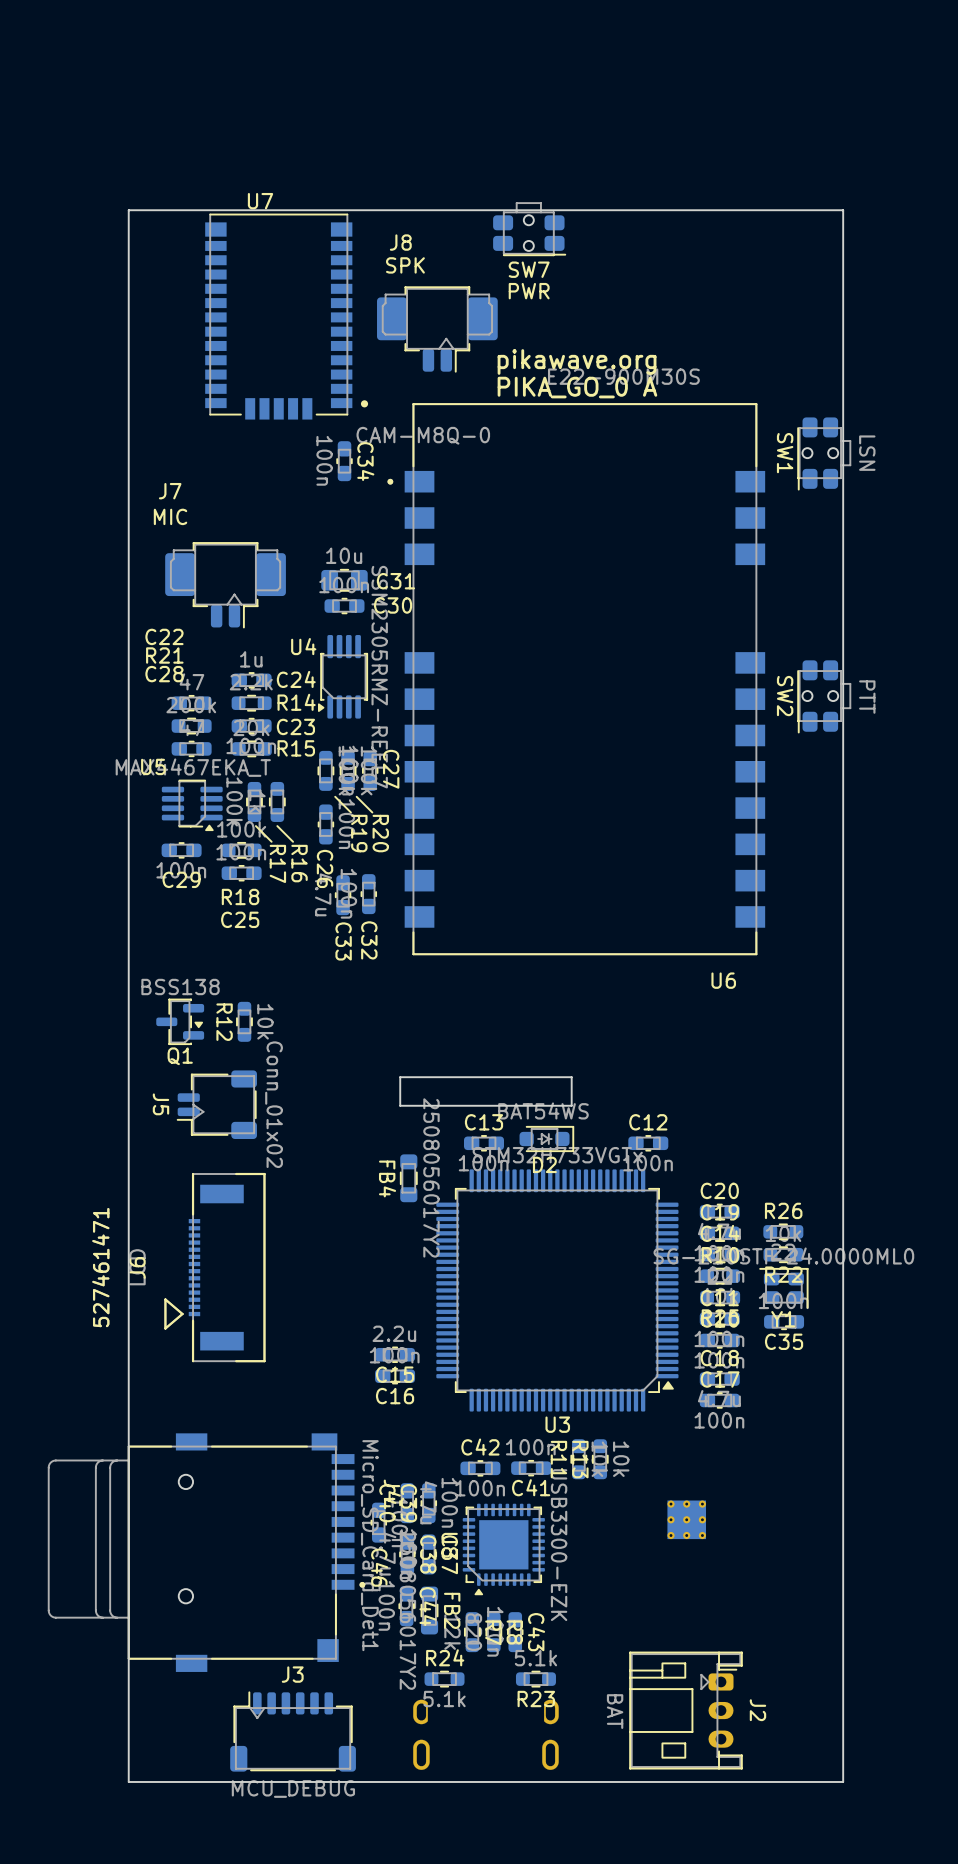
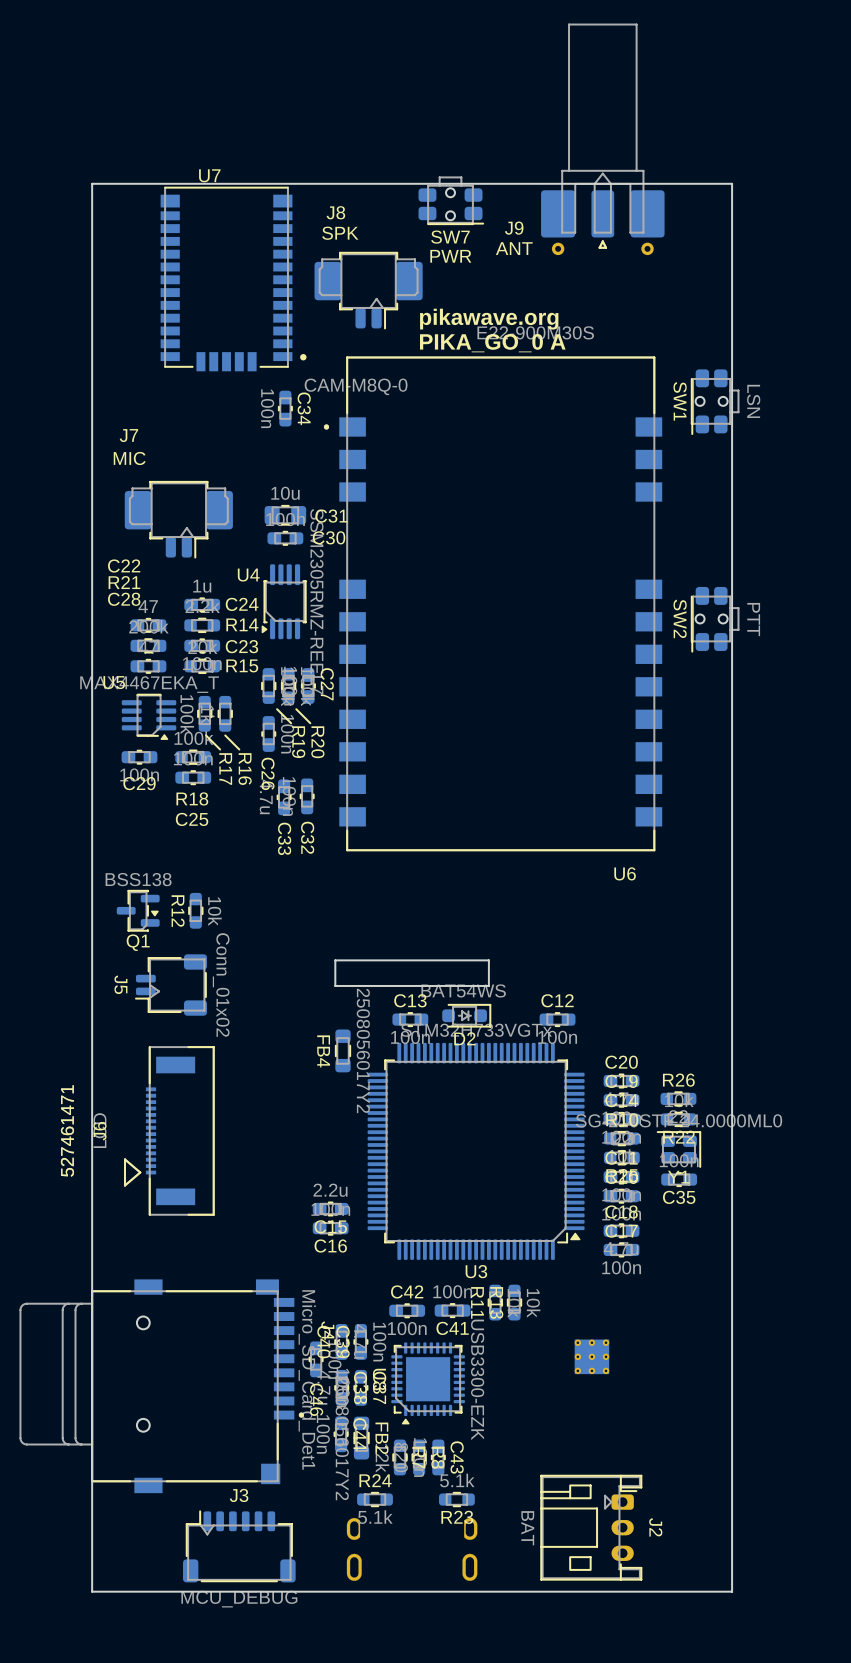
J9: none -> ANT (602, 139)

